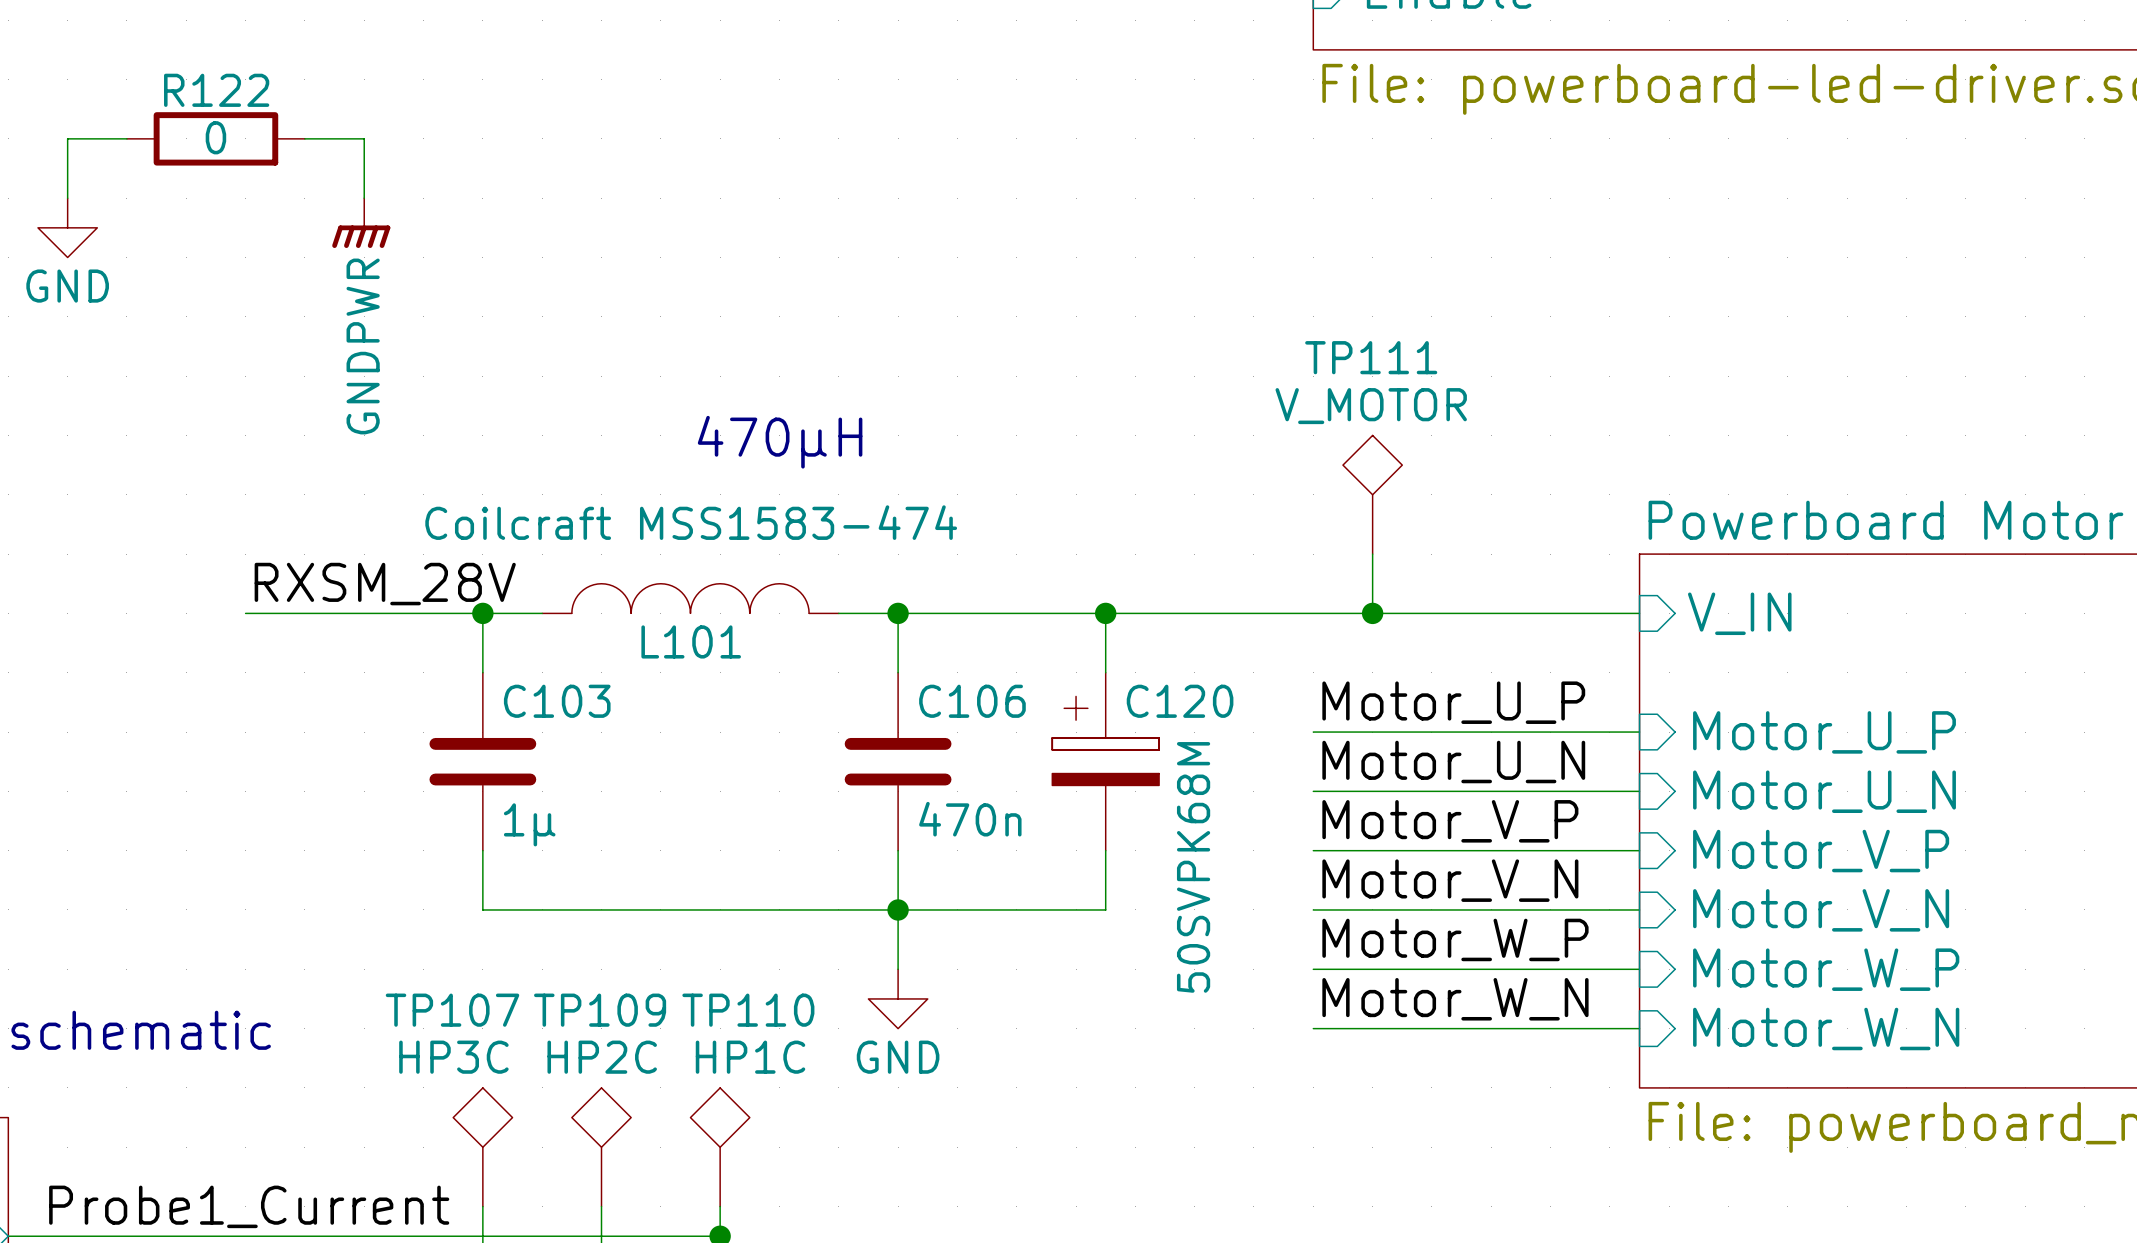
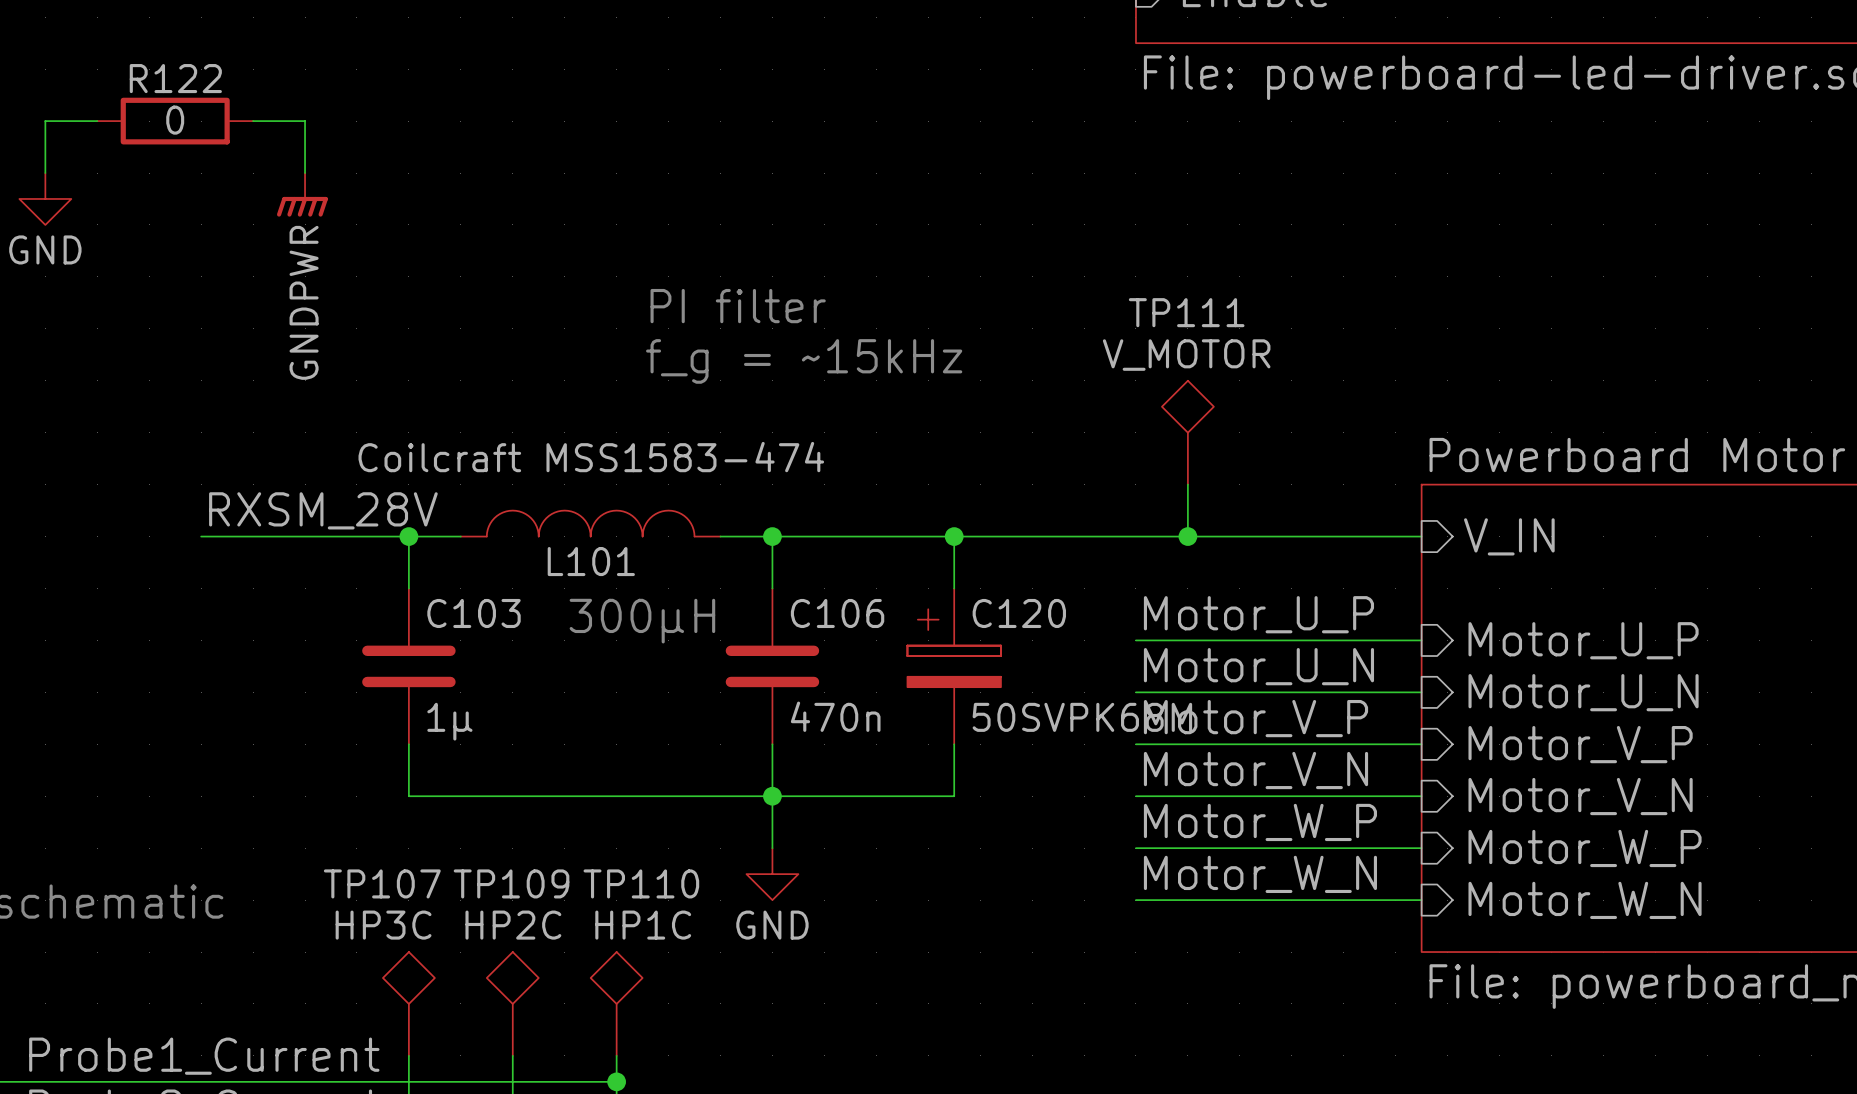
text: none -> PI filter (738, 306)
text: none -> f_g = ~15kHz (804, 361)
text: 470µH (780, 442) -> none
text: none -> 300µH (642, 621)
C120 value rotation: 0° (1193, 867) -> 90° clockwise (1082, 717)

